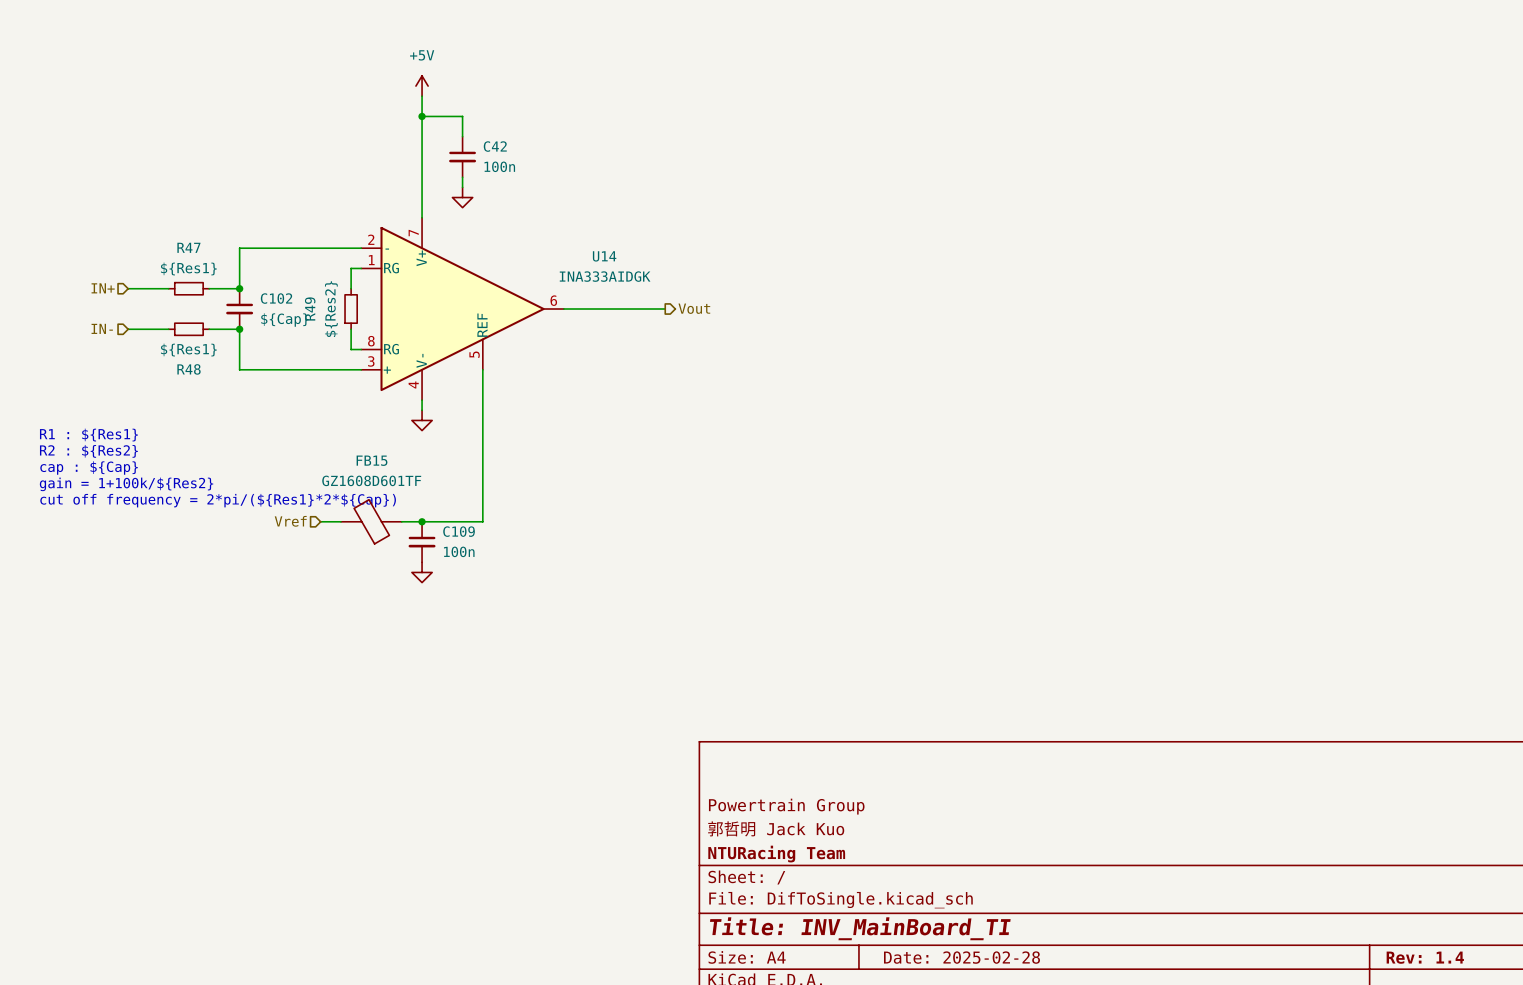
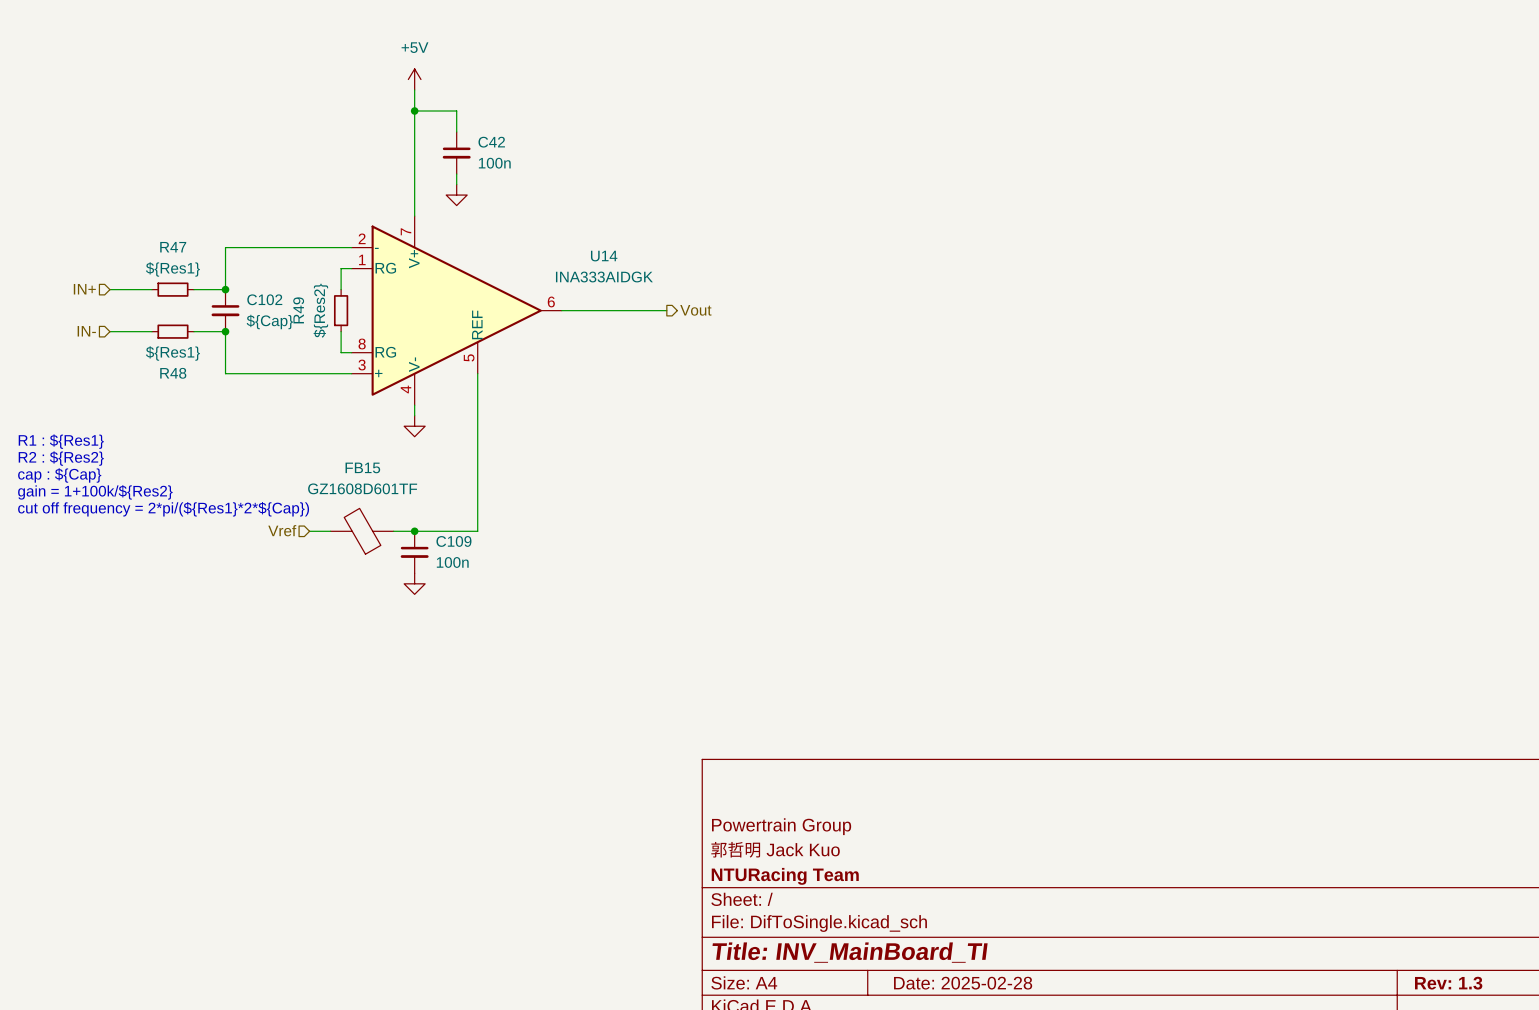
title block: Rev: 1.4 (1425, 957) -> Rev: 1.3 (1448, 983)

